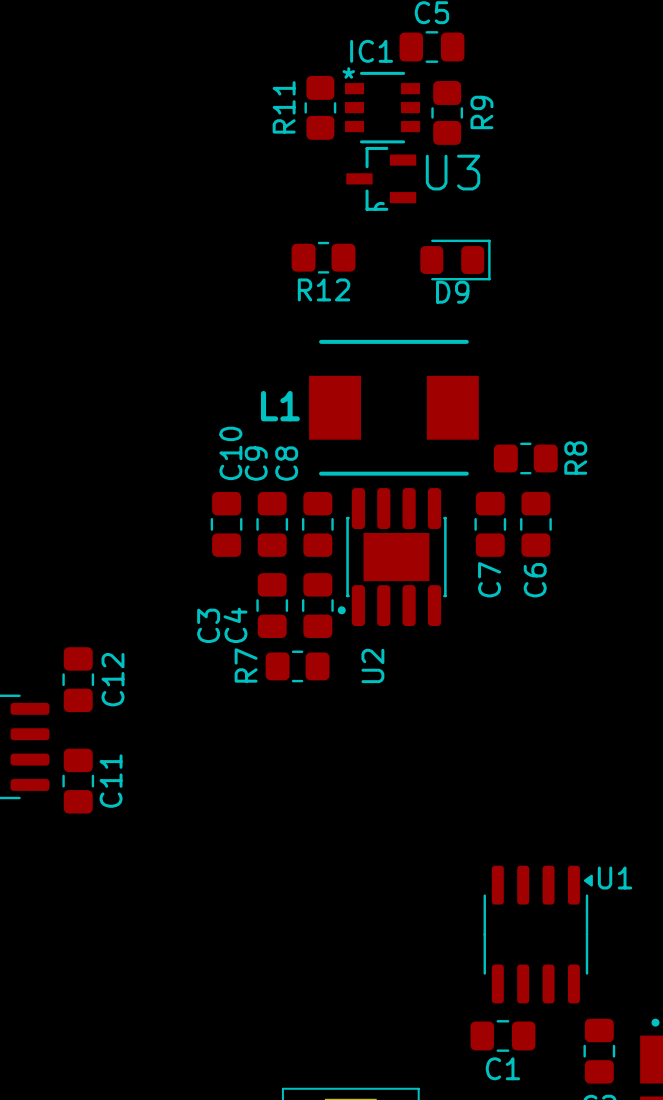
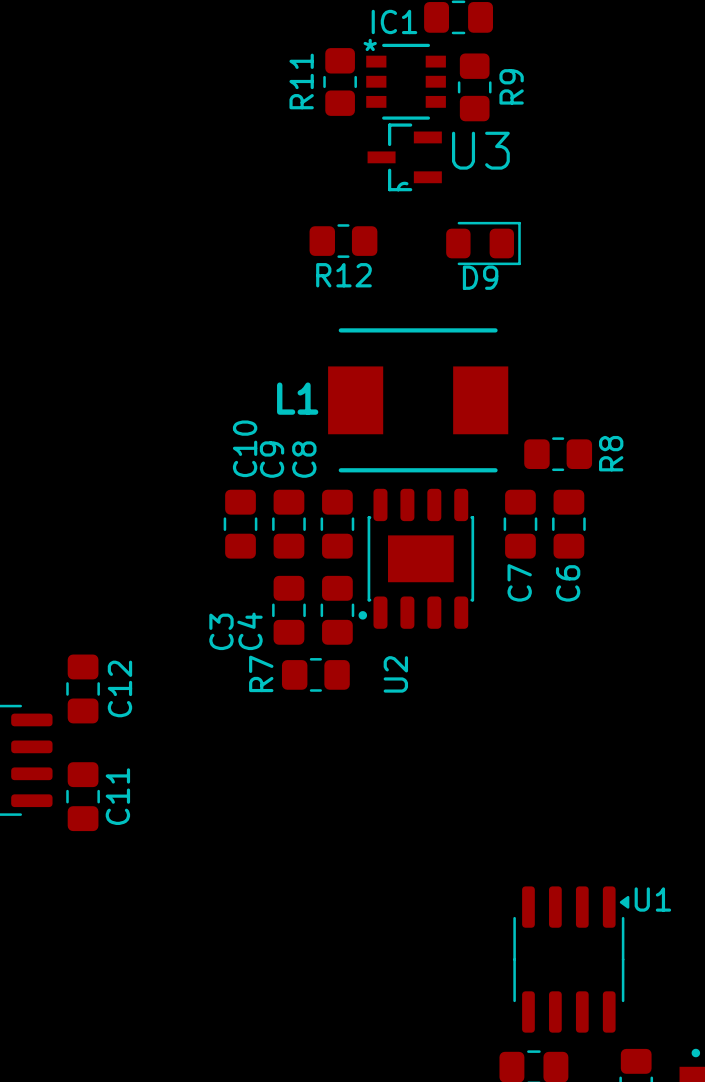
U2 footprint: [337, 488, 447, 627] -> [358, 488, 475, 629]

